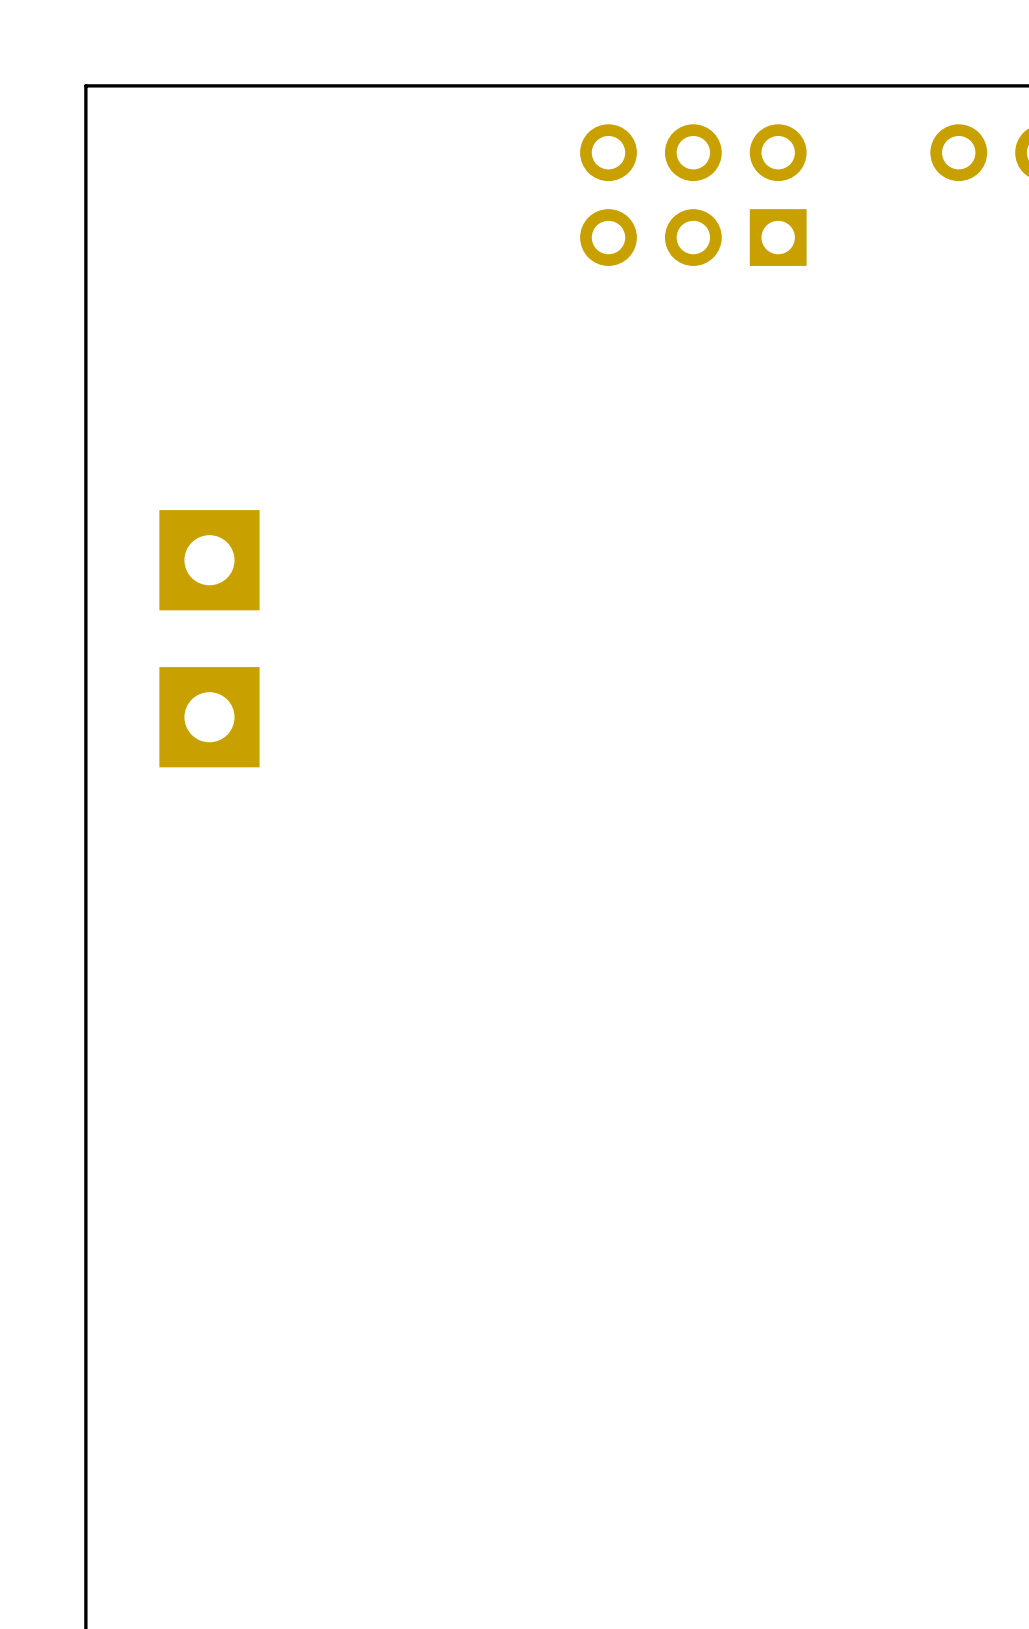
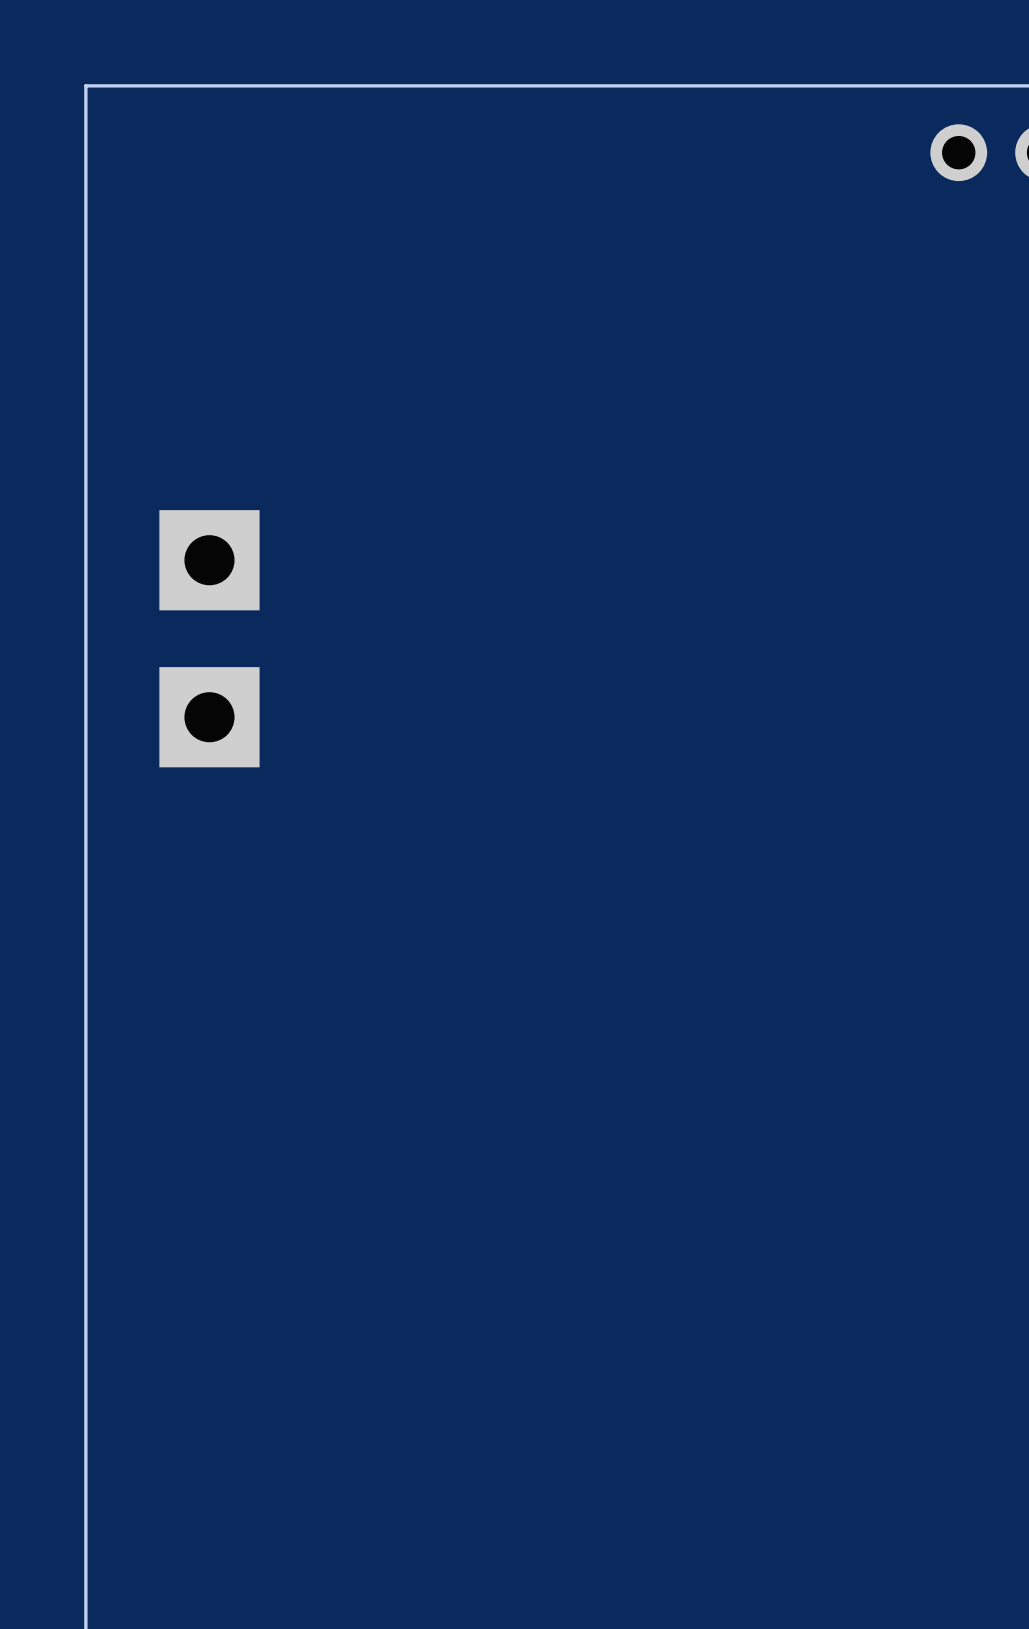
part: (693, 195) -> none

